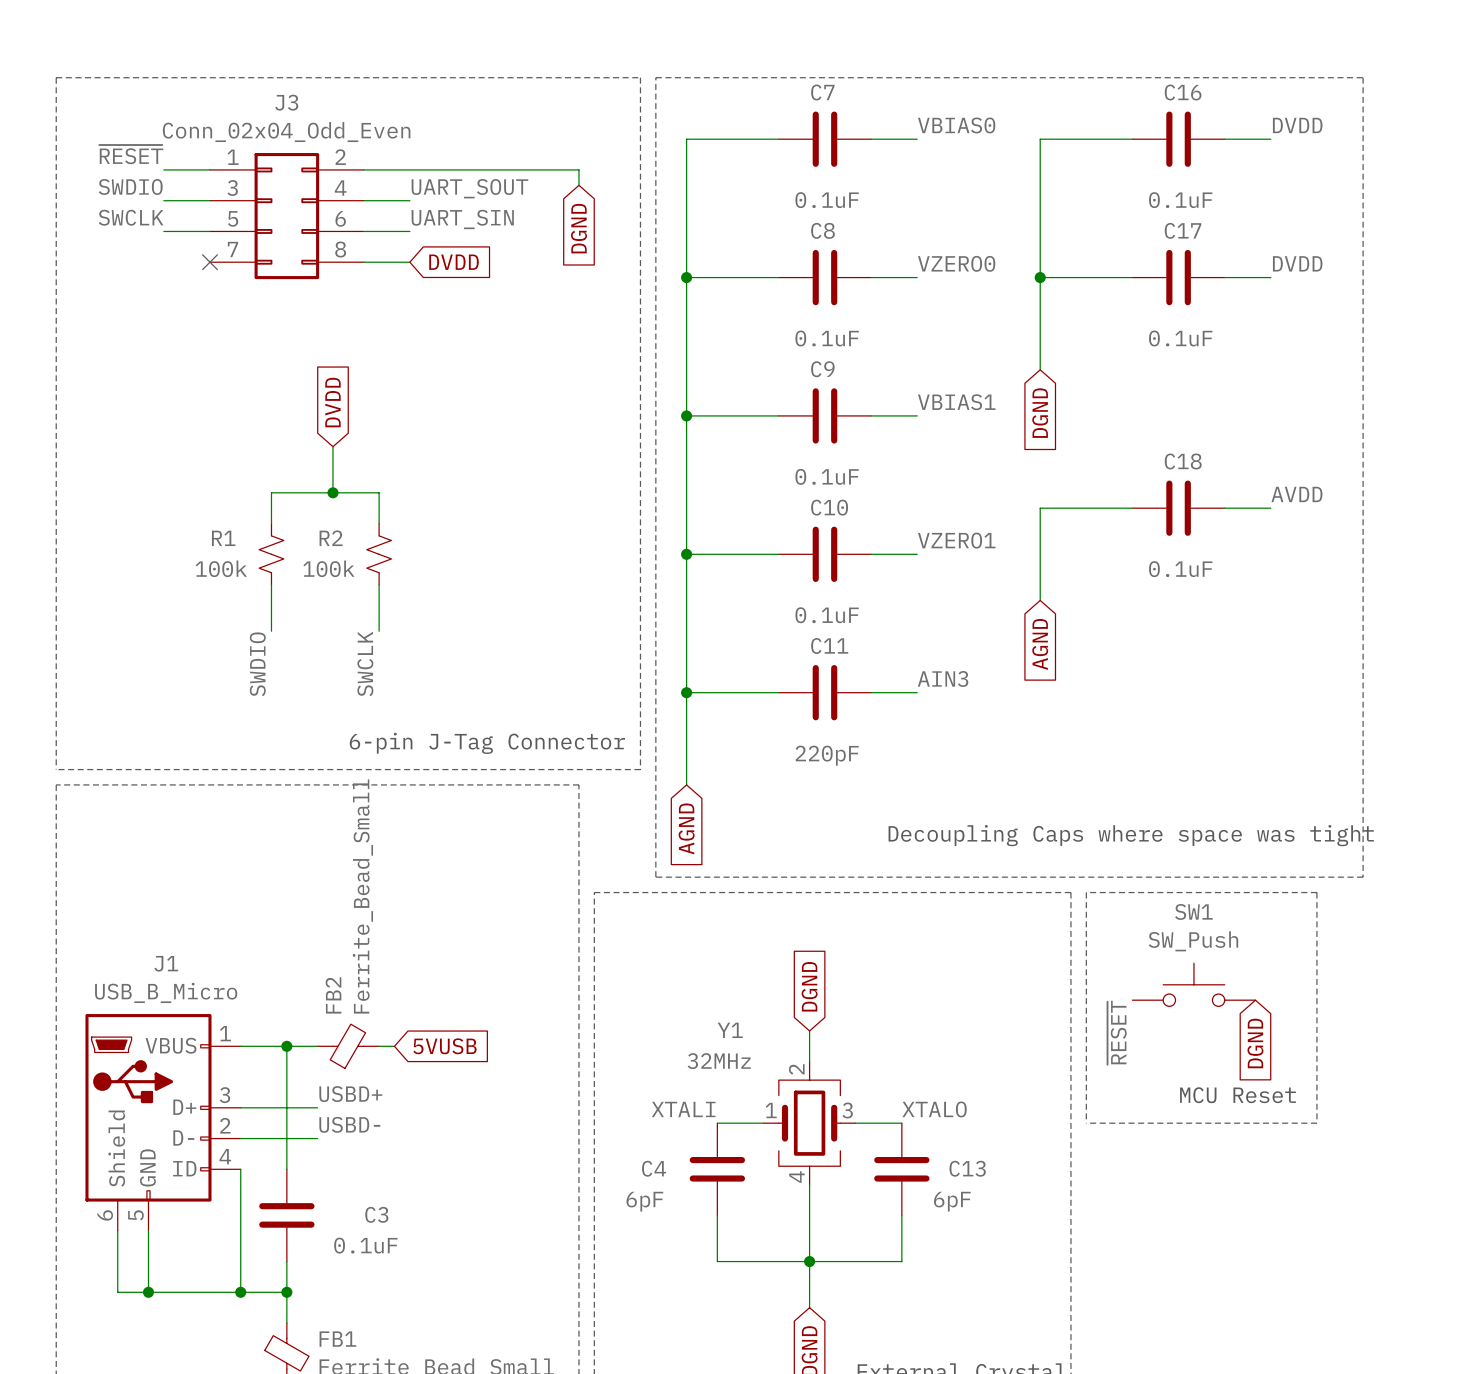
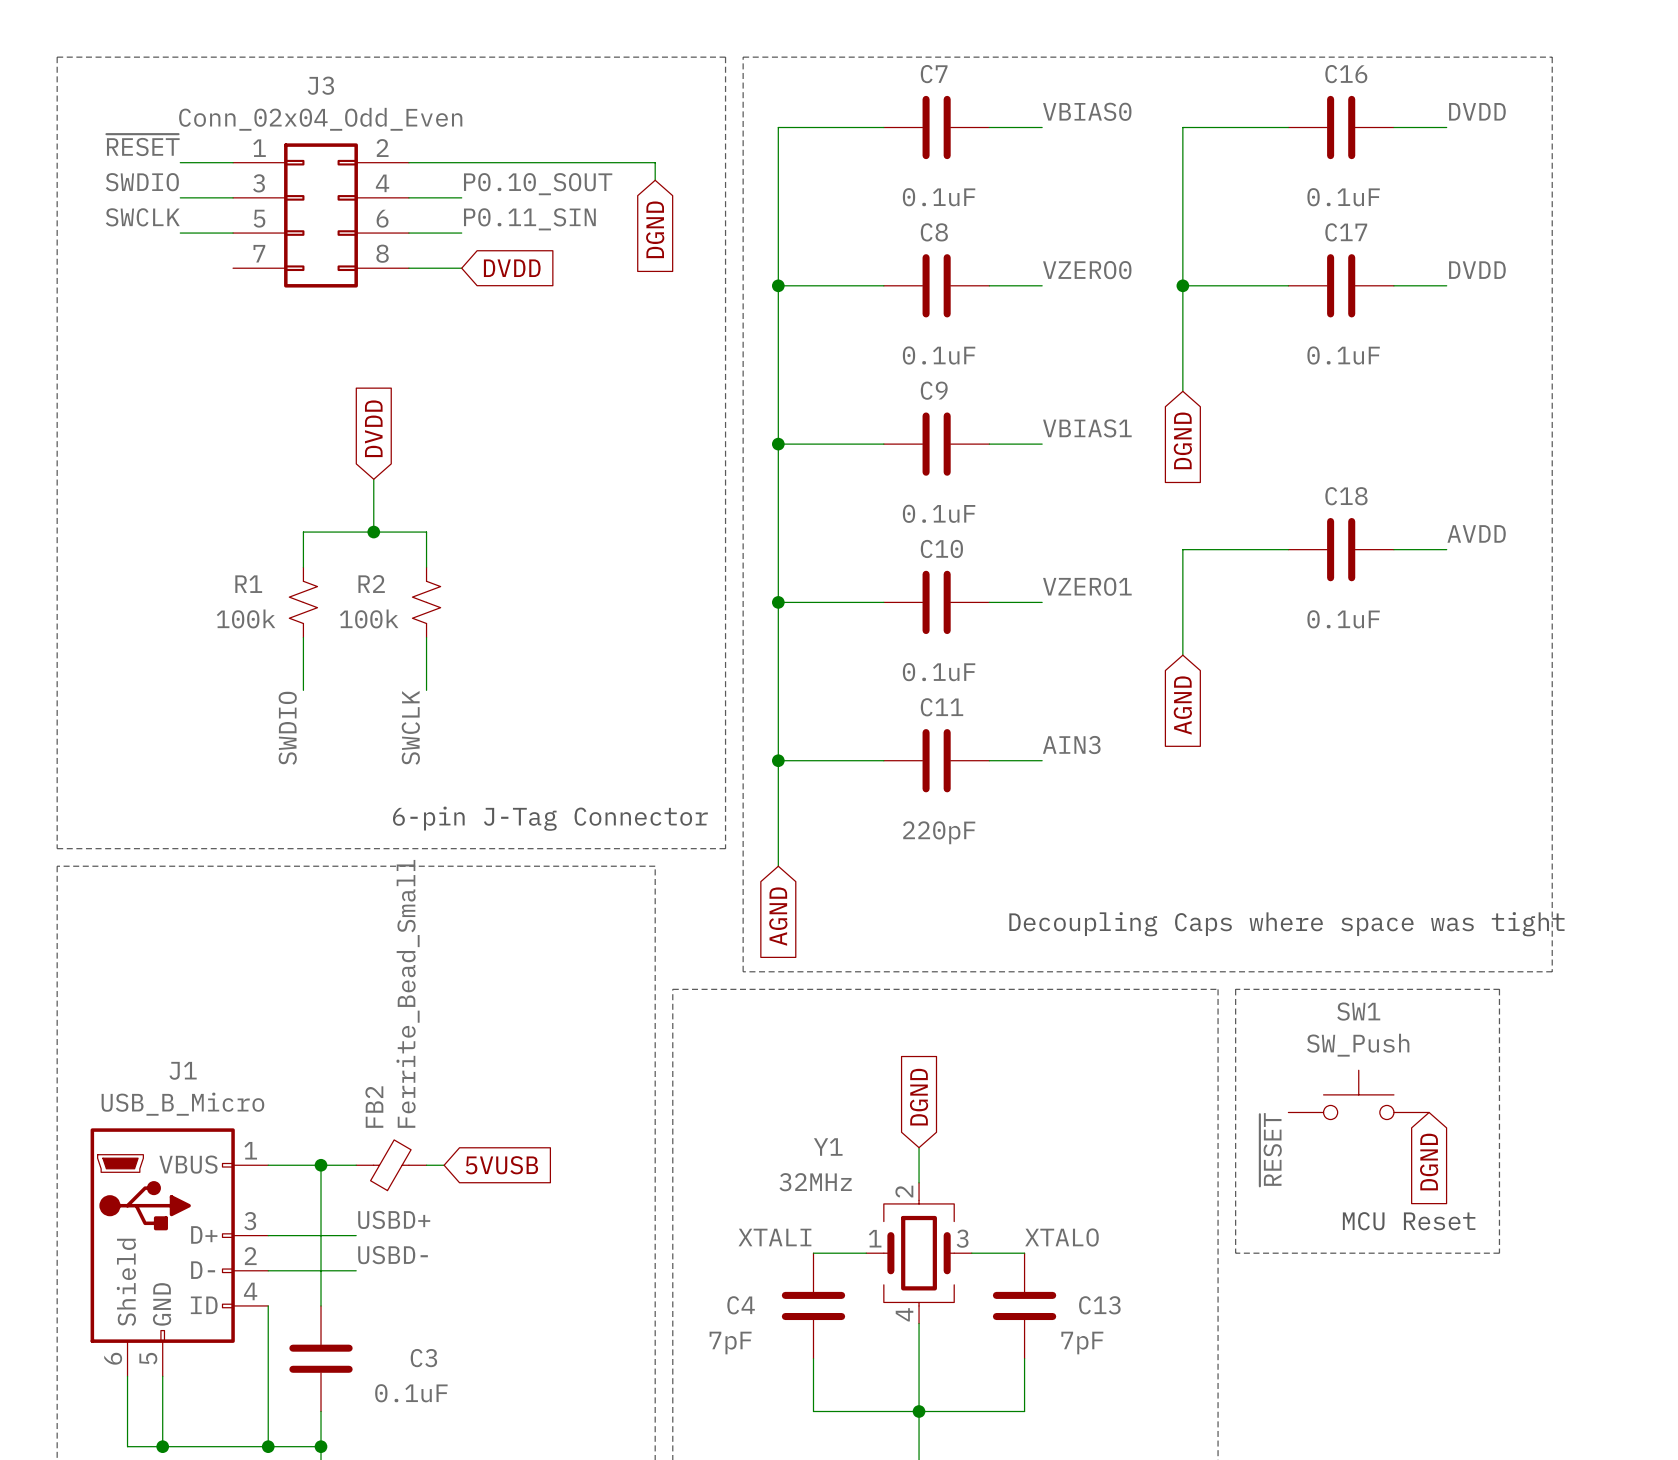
label: UART_SOUT (469, 188) -> P0.10_SOUT (538, 184)
label: UART_SIN (462, 219) -> P0.11_SIN (529, 219)
no-connect mark: (209, 262) -> none
C4 value: 6pF (644, 1201) -> 7pF (730, 1343)
C13 value: 6pF (952, 1201) -> 7pF (1082, 1343)

